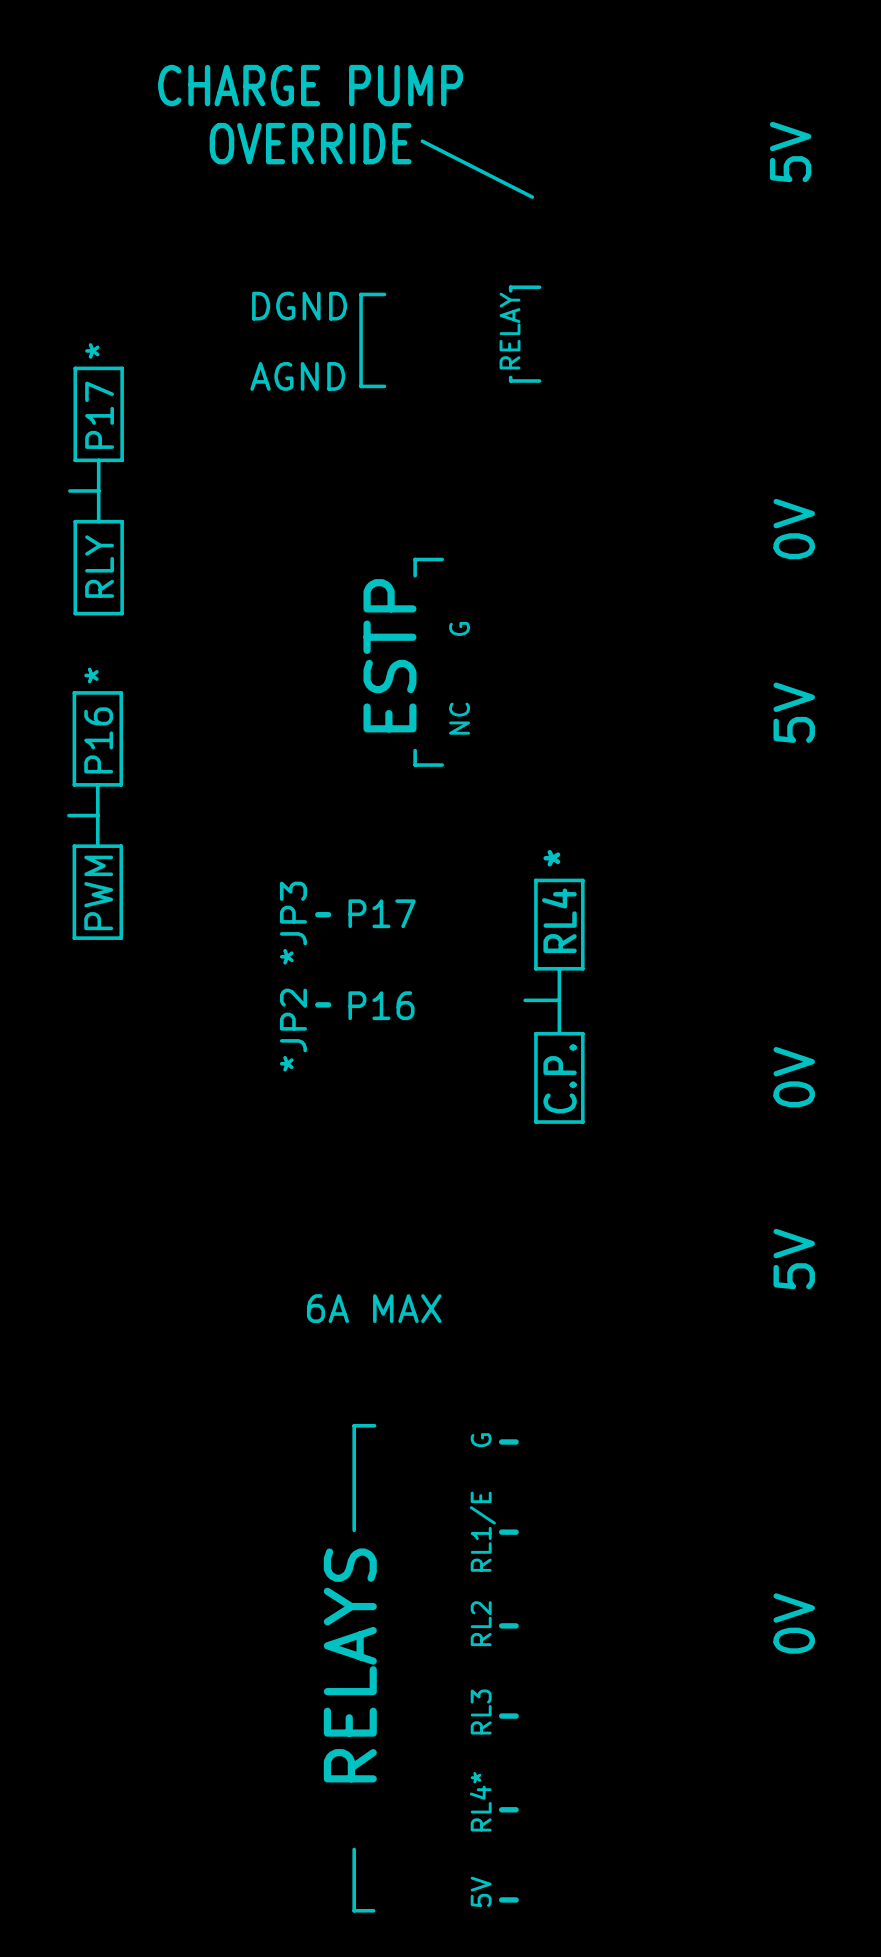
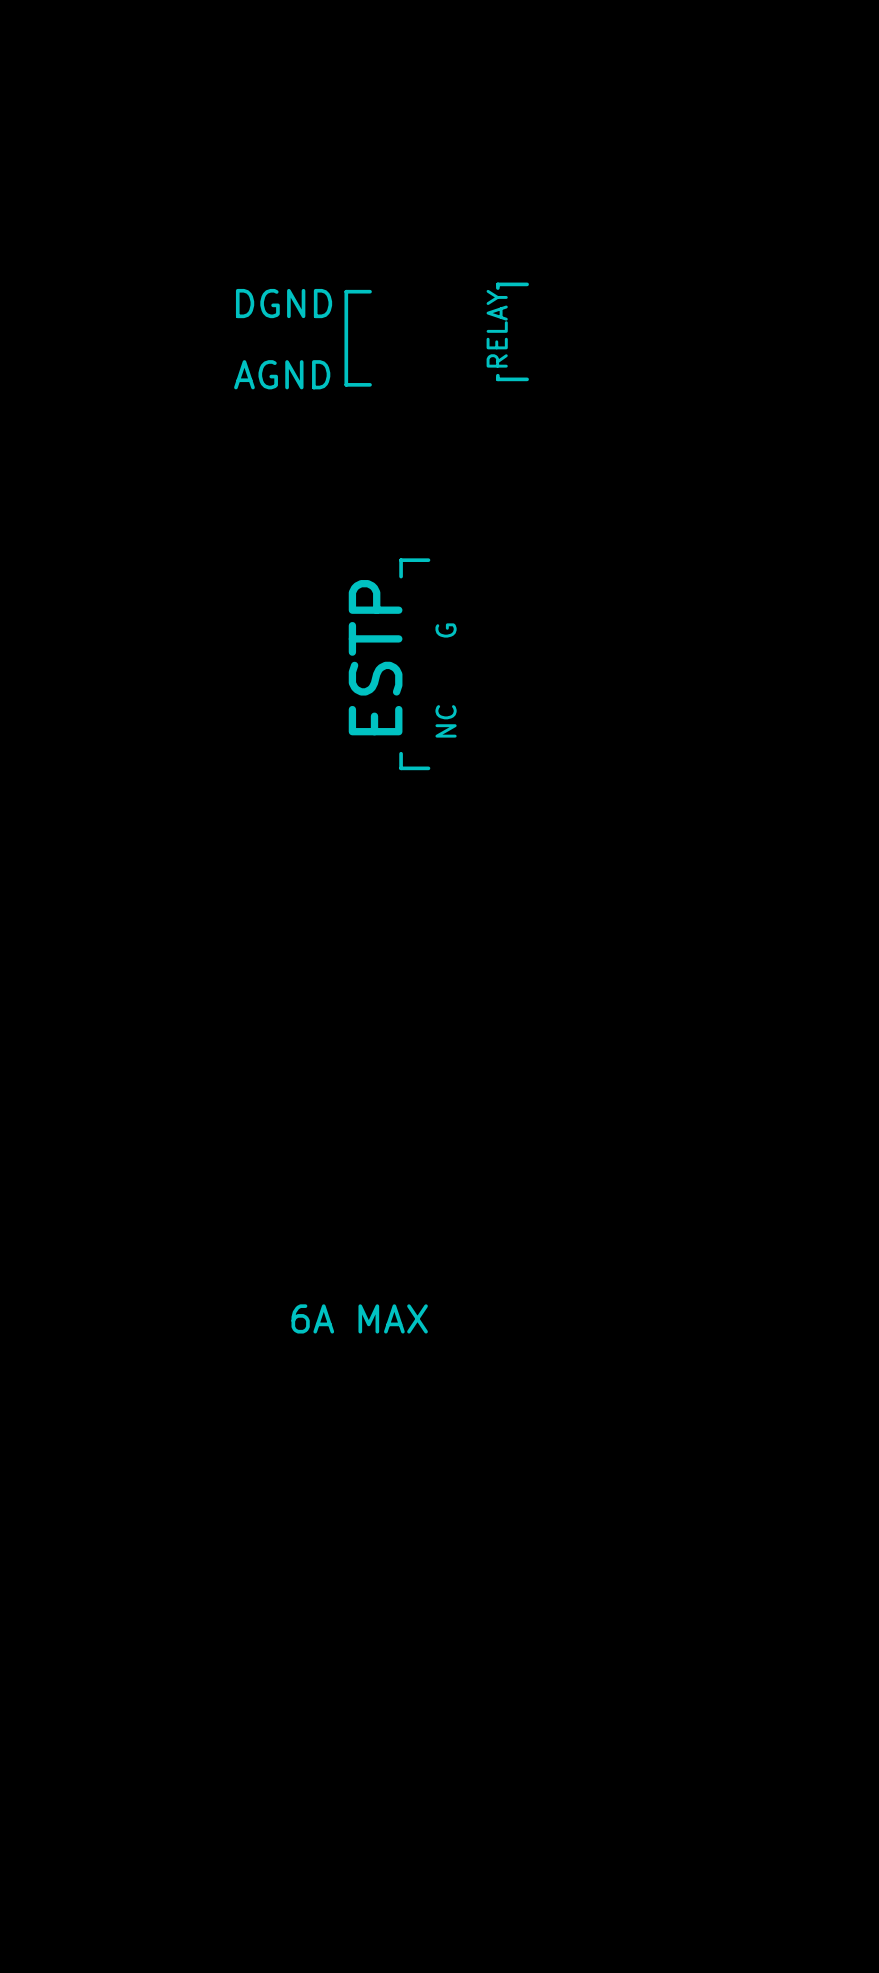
text: CHARGE PUMP (310, 85) -> none
line: (422, 141) (532, 197) -> none
text: OVERRIDE (310, 143) -> none
text: 5V (790, 151) -> none
line: (75, 368) (75, 460) (122, 460) (122, 368) (75, 368) -> none
text: P17 * (99, 396) -> none
line: (98, 460) (98, 521) -> none
line: (69, 490) (98, 490) -> none
line: (75, 521) (122, 521) (122, 613) (75, 613) (75, 521) -> none
text: 0V (794, 529) -> none
text: RLY (99, 566) -> none
line: (74, 692) (121, 692) (121, 784) (74, 784) (74, 692) -> none
text: 5V (794, 712) -> none
text: P16 * (98, 720) -> none
line: (97, 784) (97, 846) -> none
line: (68, 815) (97, 815) -> none
line: (74, 846) (74, 938) (121, 938) (121, 846) (74, 846) -> none
line: (535, 880) (535, 968) (582, 968) (582, 880) (535, 880) -> none
text: PWM (98, 892) -> none
text: RL4 * (559, 901) -> none
text: P17 (382, 913) -> none
line: (317, 914) (328, 914) -> none
line: (559, 969) (559, 1032) -> none
text: *JP2 *JP3 (293, 976) -> none
line: (525, 1000) (559, 1000) -> none
line: (317, 1004) (328, 1004) -> none
text: P16 (381, 1005) -> none
line: (535, 1033) (582, 1033) (582, 1122) (535, 1122) (535, 1033) -> none
text: 0V (794, 1077) -> none
text: C.P. (560, 1078) -> none
text: 5V (794, 1259) -> none
line: (374, 1425) (354, 1425) (354, 1530) -> none
text: G (481, 1440) -> none
line: (501, 1441) (516, 1441) -> none
text: RL1/E (482, 1531) -> none
line: (501, 1532) (516, 1532) -> none
text: RL2 (481, 1623) -> none
text: 0V (794, 1623) -> none
line: (501, 1625) (516, 1625) -> none
text: RELAYS (350, 1665) -> none
text: RL3 (481, 1712) -> none
line: (501, 1716) (516, 1716) -> none
text: RL4* (480, 1801) -> none
line: (501, 1809) (516, 1809) -> none
line: (354, 1849) (354, 1910) (373, 1910) -> none
text: 5V (481, 1891) -> none
line: (501, 1899) (516, 1899) -> none

